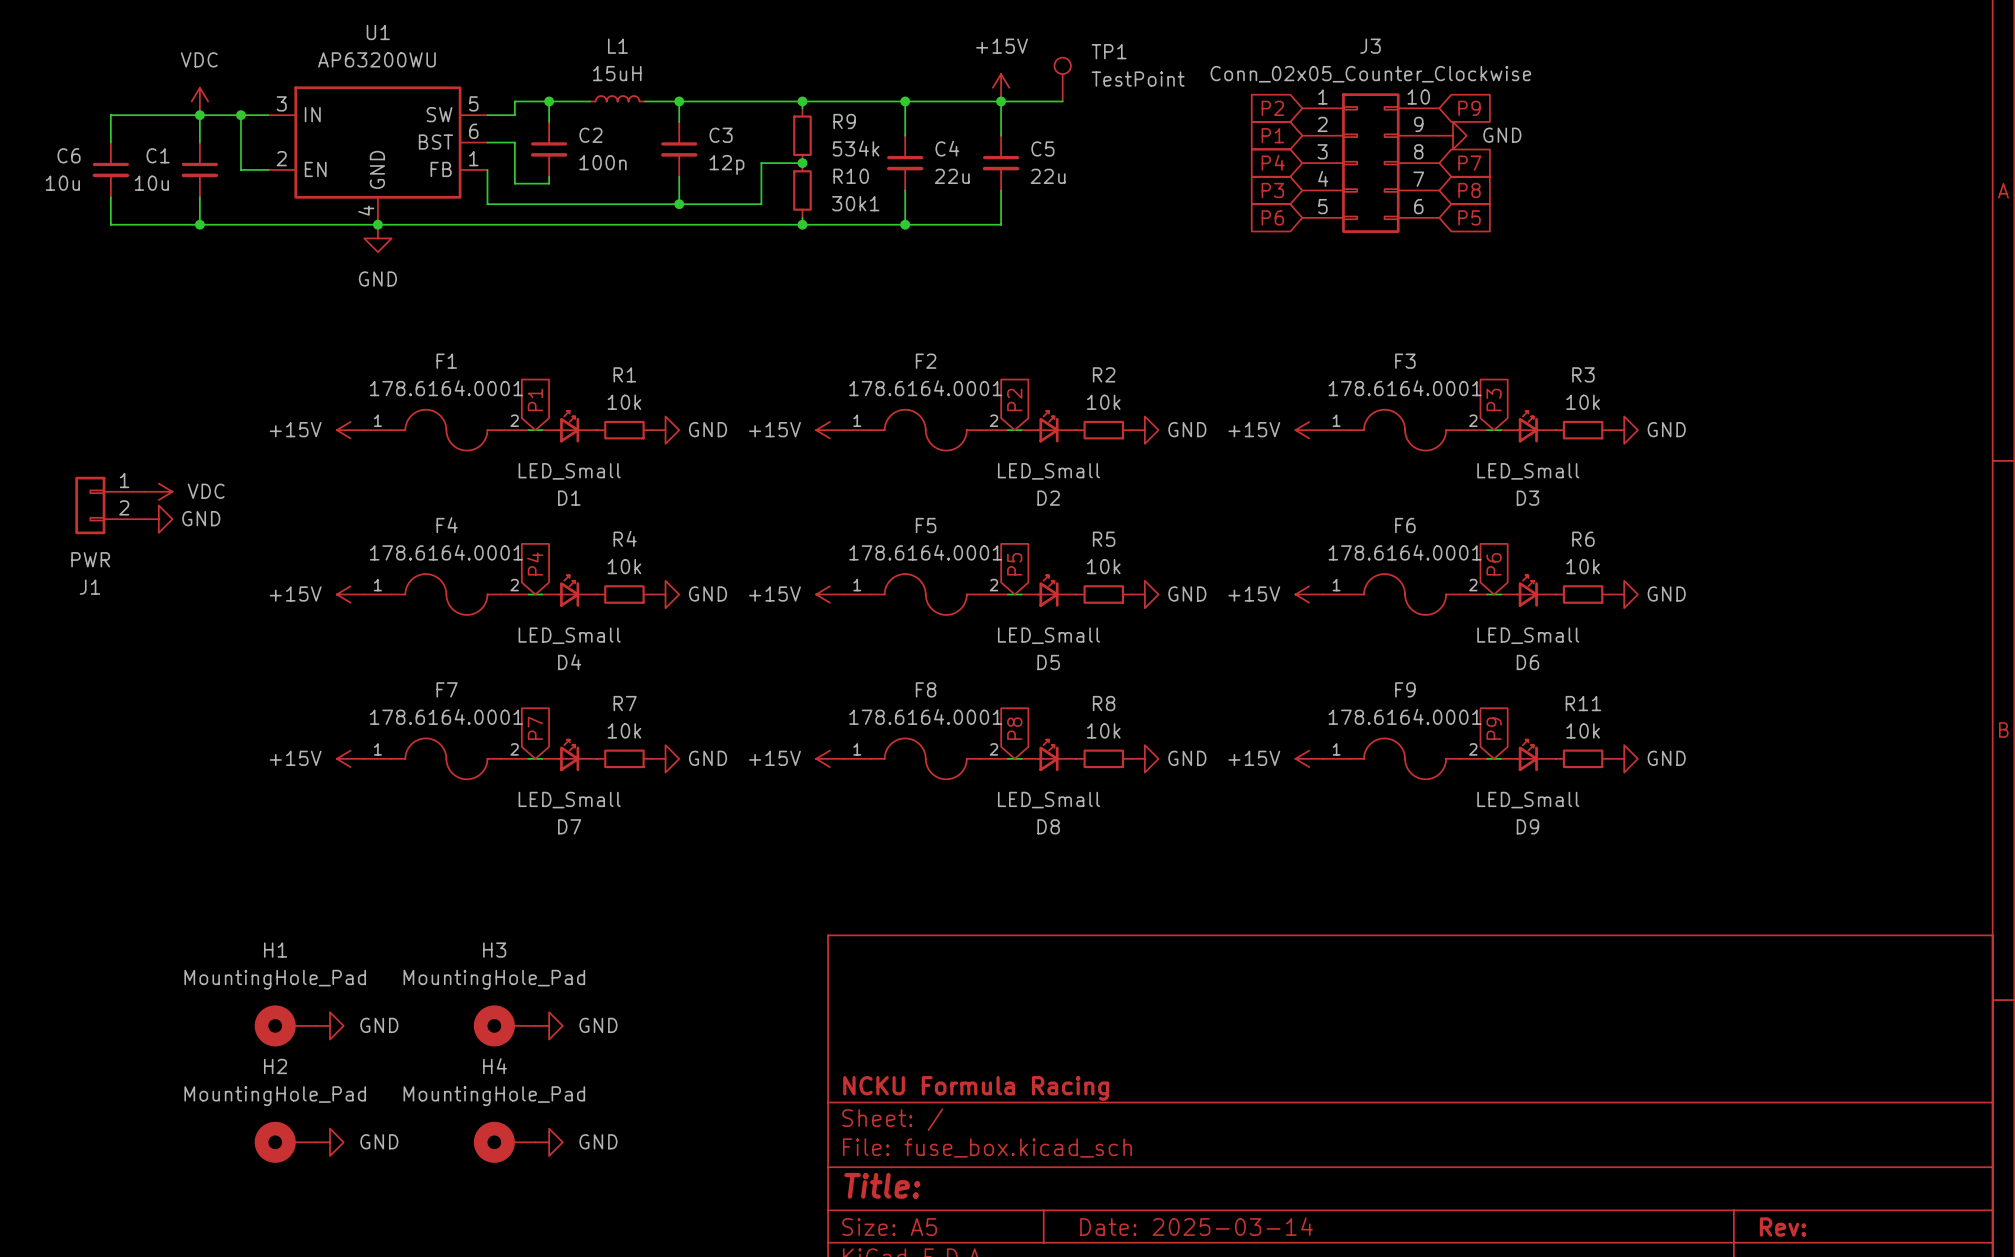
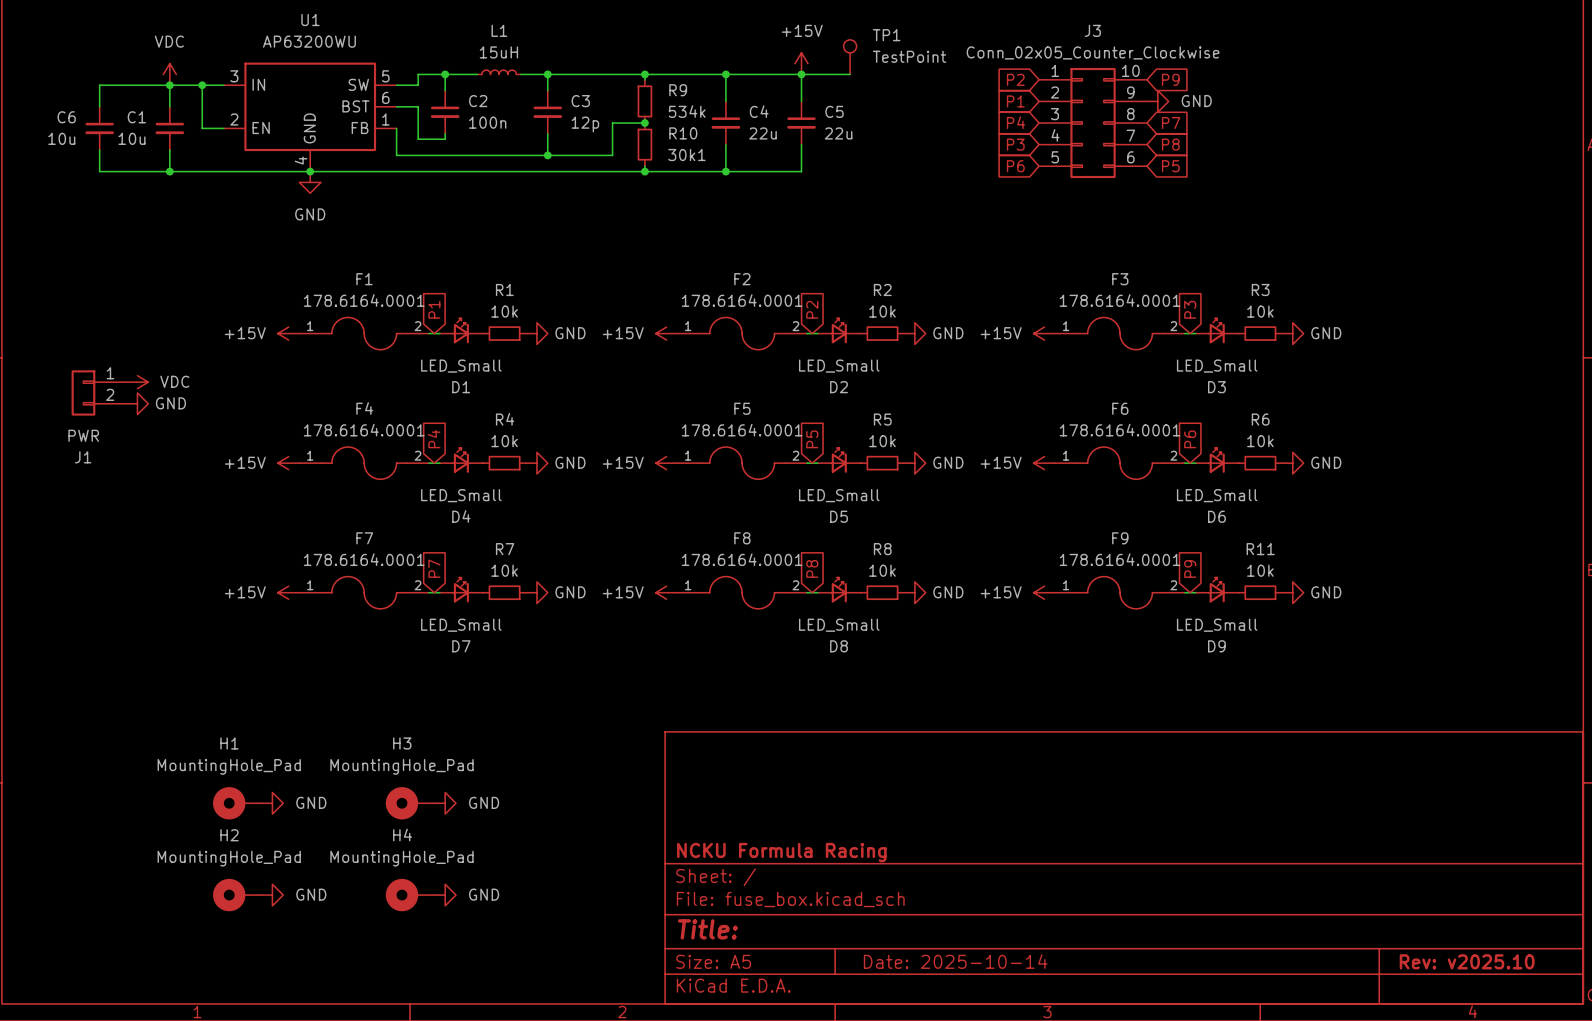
title block: Date: 2025-03-14 (1196, 1226) -> Date: 2025-10-14 (955, 961)
title block: Rev: (1782, 1227) -> Rev: v2025.10 (1467, 961)

